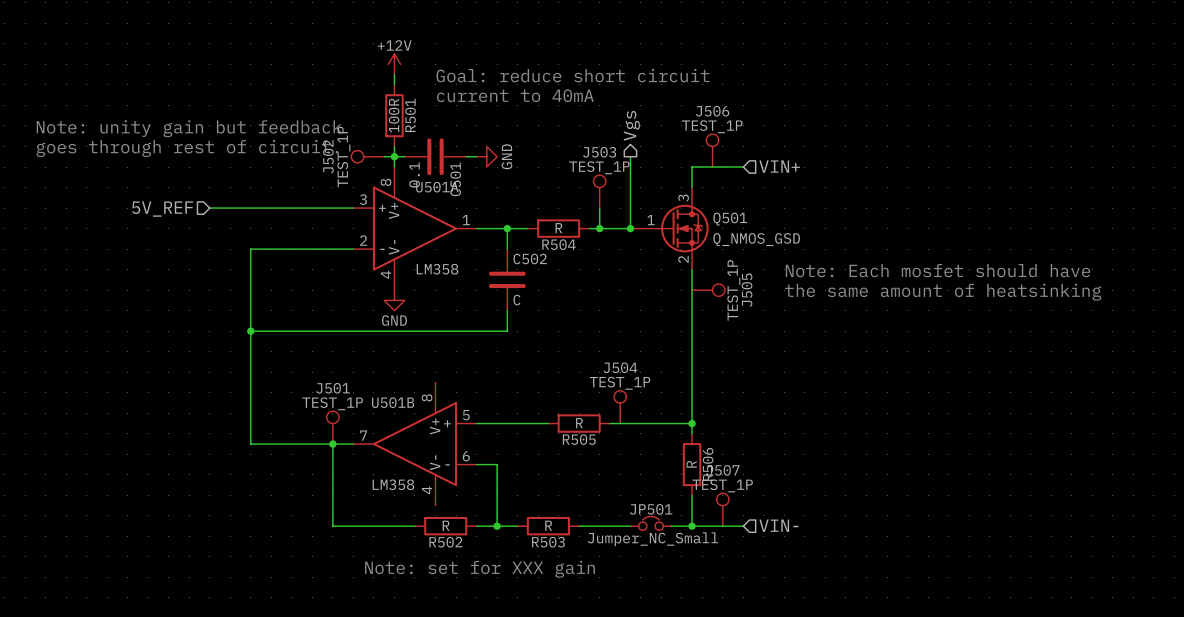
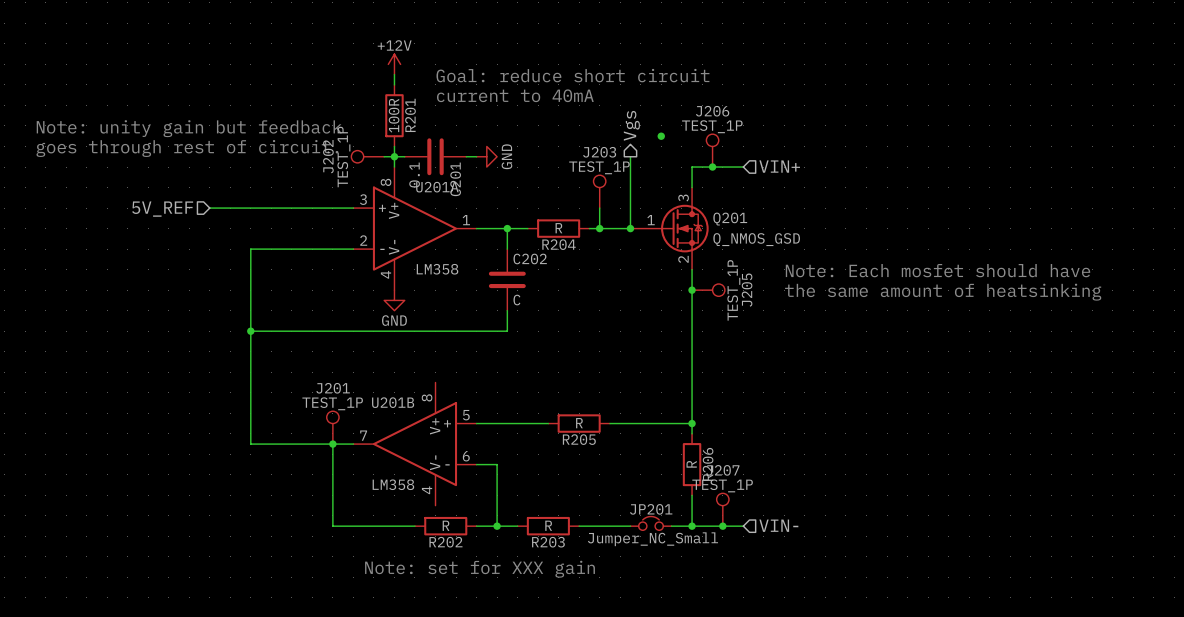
J506 name: J506 (712, 111) -> J206 (712, 111)
R501 name: R501 (410, 115) -> R201 (410, 115)
junction: none -> (661, 136)
J503 name: J503 (599, 152) -> J203 (599, 152)
J502 name: J502 (328, 156) -> J202 (328, 156)
junction: none -> (712, 167)
C501 name: C501 (455, 179) -> C201 (455, 179)
U501A name: U501A (437, 187) -> U201A (437, 187)
Q501 name: Q501 (730, 219) -> Q201 (730, 219)
R504 name: R504 (559, 244) -> R204 (559, 244)
C502 name: C502 (530, 258) -> C202 (530, 258)
junction: none -> (692, 290)
J505 name: J505 (747, 290) -> J205 (747, 290)
J501 name: J501 (333, 388) -> J201 (333, 388)
U501B name: U501B (393, 402) -> U201B (393, 402)
J504: TEST_1P (620, 407) -> none
R505 name: R505 (579, 439) -> R205 (579, 439)
R506 name: R506 (708, 464) -> R206 (708, 464)
J507 name: J507 (722, 470) -> J207 (722, 470)
JP501 name: JP501 (651, 509) -> JP201 (651, 509)
junction: none -> (722, 526)
R502 name: R502 (445, 542) -> R202 (445, 542)
R503 name: R503 (548, 542) -> R203 (548, 542)

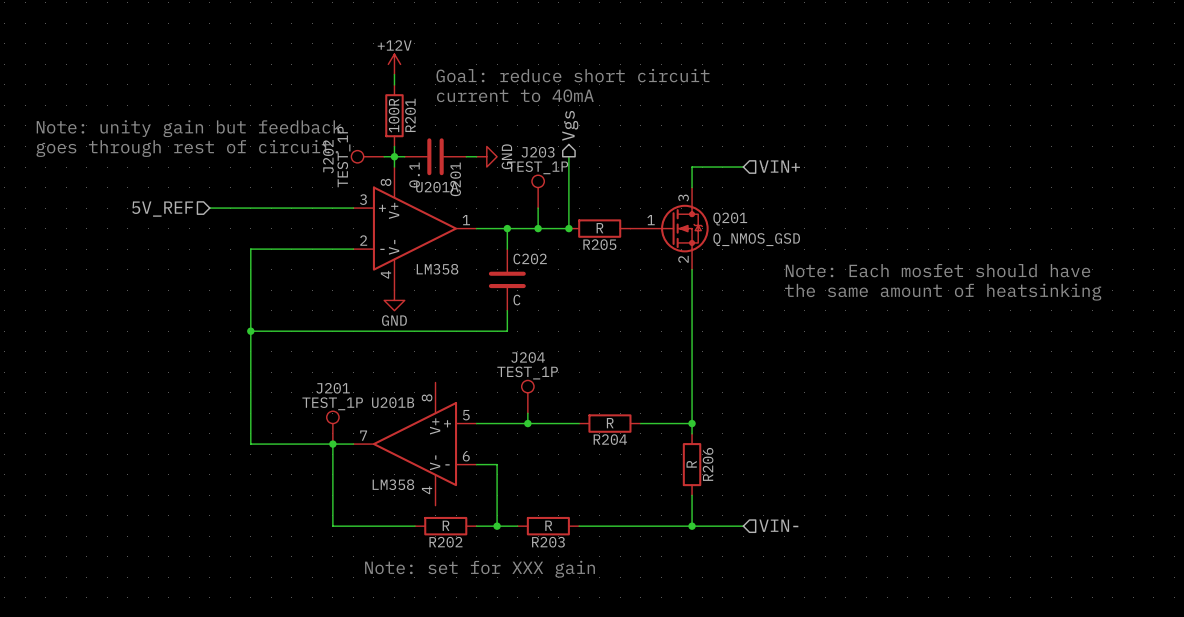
hierarchical label position: Vgs (631, 125) -> Vgs (570, 125)
junction: (661, 136) -> none
J206: TEST_1P (712, 150) -> none
wire: (630, 156) (630, 228) (589, 228) -> (568, 156) (568, 228) (527, 228)
junction: (712, 167) -> none
J203 position: (599, 191) -> (538, 191)
wire: (599, 208) (599, 228) -> (538, 208) (538, 228)
junction: none -> (538, 228)
R204 position: (558, 228) -> (609, 423)
junction: none -> (568, 228)
junction: (599, 228) -> none
junction: (630, 228) -> none
junction: (692, 290) -> none
J205: TEST_1P (708, 290) -> none
J204: none -> TEST_1P (527, 396)
wire: none -> (527, 413) (527, 423)
junction: none -> (527, 423)
R205 position: (579, 423) -> (599, 228)
wire: (609, 423) (640, 423) -> (548, 423) (579, 423)
J207: TEST_1P (722, 509) -> none
JP201: Jumper_NC_Small (650, 523) -> none
wire: none -> (630, 526) (671, 526)
junction: (722, 526) -> none

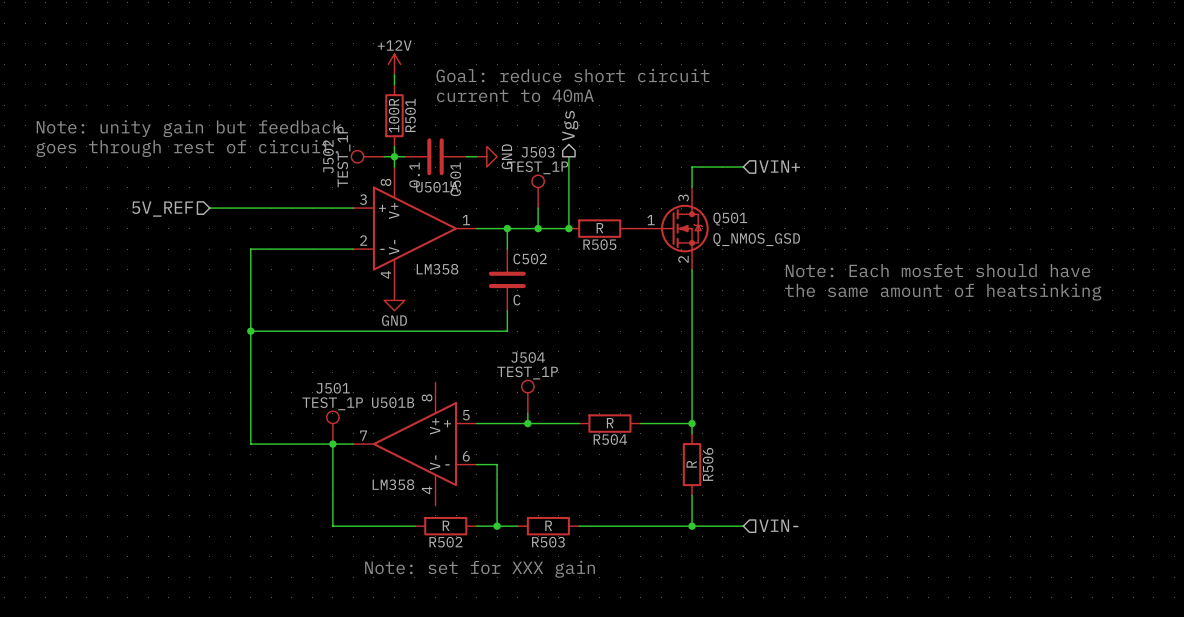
R201 name: R201 (410, 115) -> R501 (410, 115)
J203 name: J203 (538, 152) -> J503 (538, 152)
J202 name: J202 (328, 156) -> J502 (328, 156)
C201 name: C201 (455, 179) -> C501 (455, 179)
U201A name: U201A (437, 187) -> U501A (437, 187)
Q201 name: Q201 (730, 219) -> Q501 (730, 219)
R205 name: R205 (599, 244) -> R505 (599, 244)
C202 name: C202 (530, 258) -> C502 (530, 258)
J204 name: J204 (528, 357) -> J504 (528, 357)
J201 name: J201 (333, 388) -> J501 (333, 388)
U201B name: U201B (393, 402) -> U501B (393, 402)
R204 name: R204 (610, 439) -> R504 (610, 439)
R206 name: R206 (708, 464) -> R506 (708, 464)
R202 name: R202 (445, 542) -> R502 (445, 542)
R203 name: R203 (548, 542) -> R503 (548, 542)

